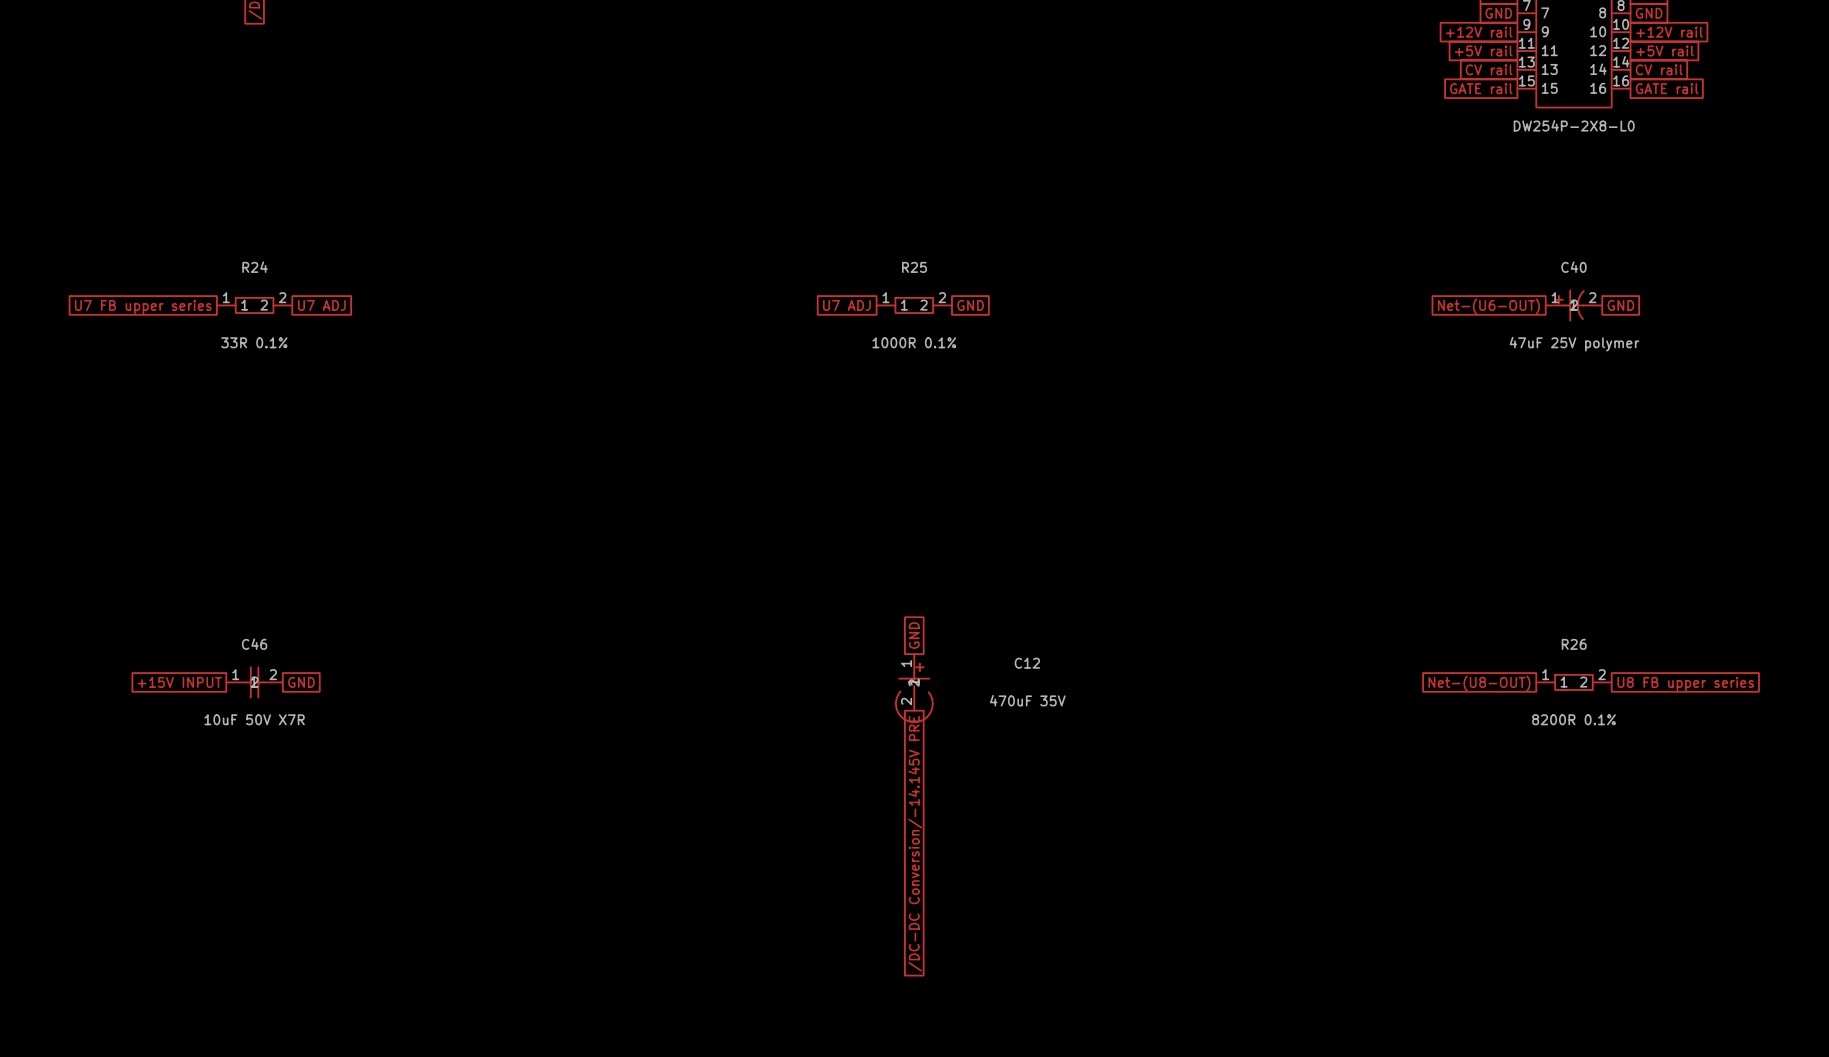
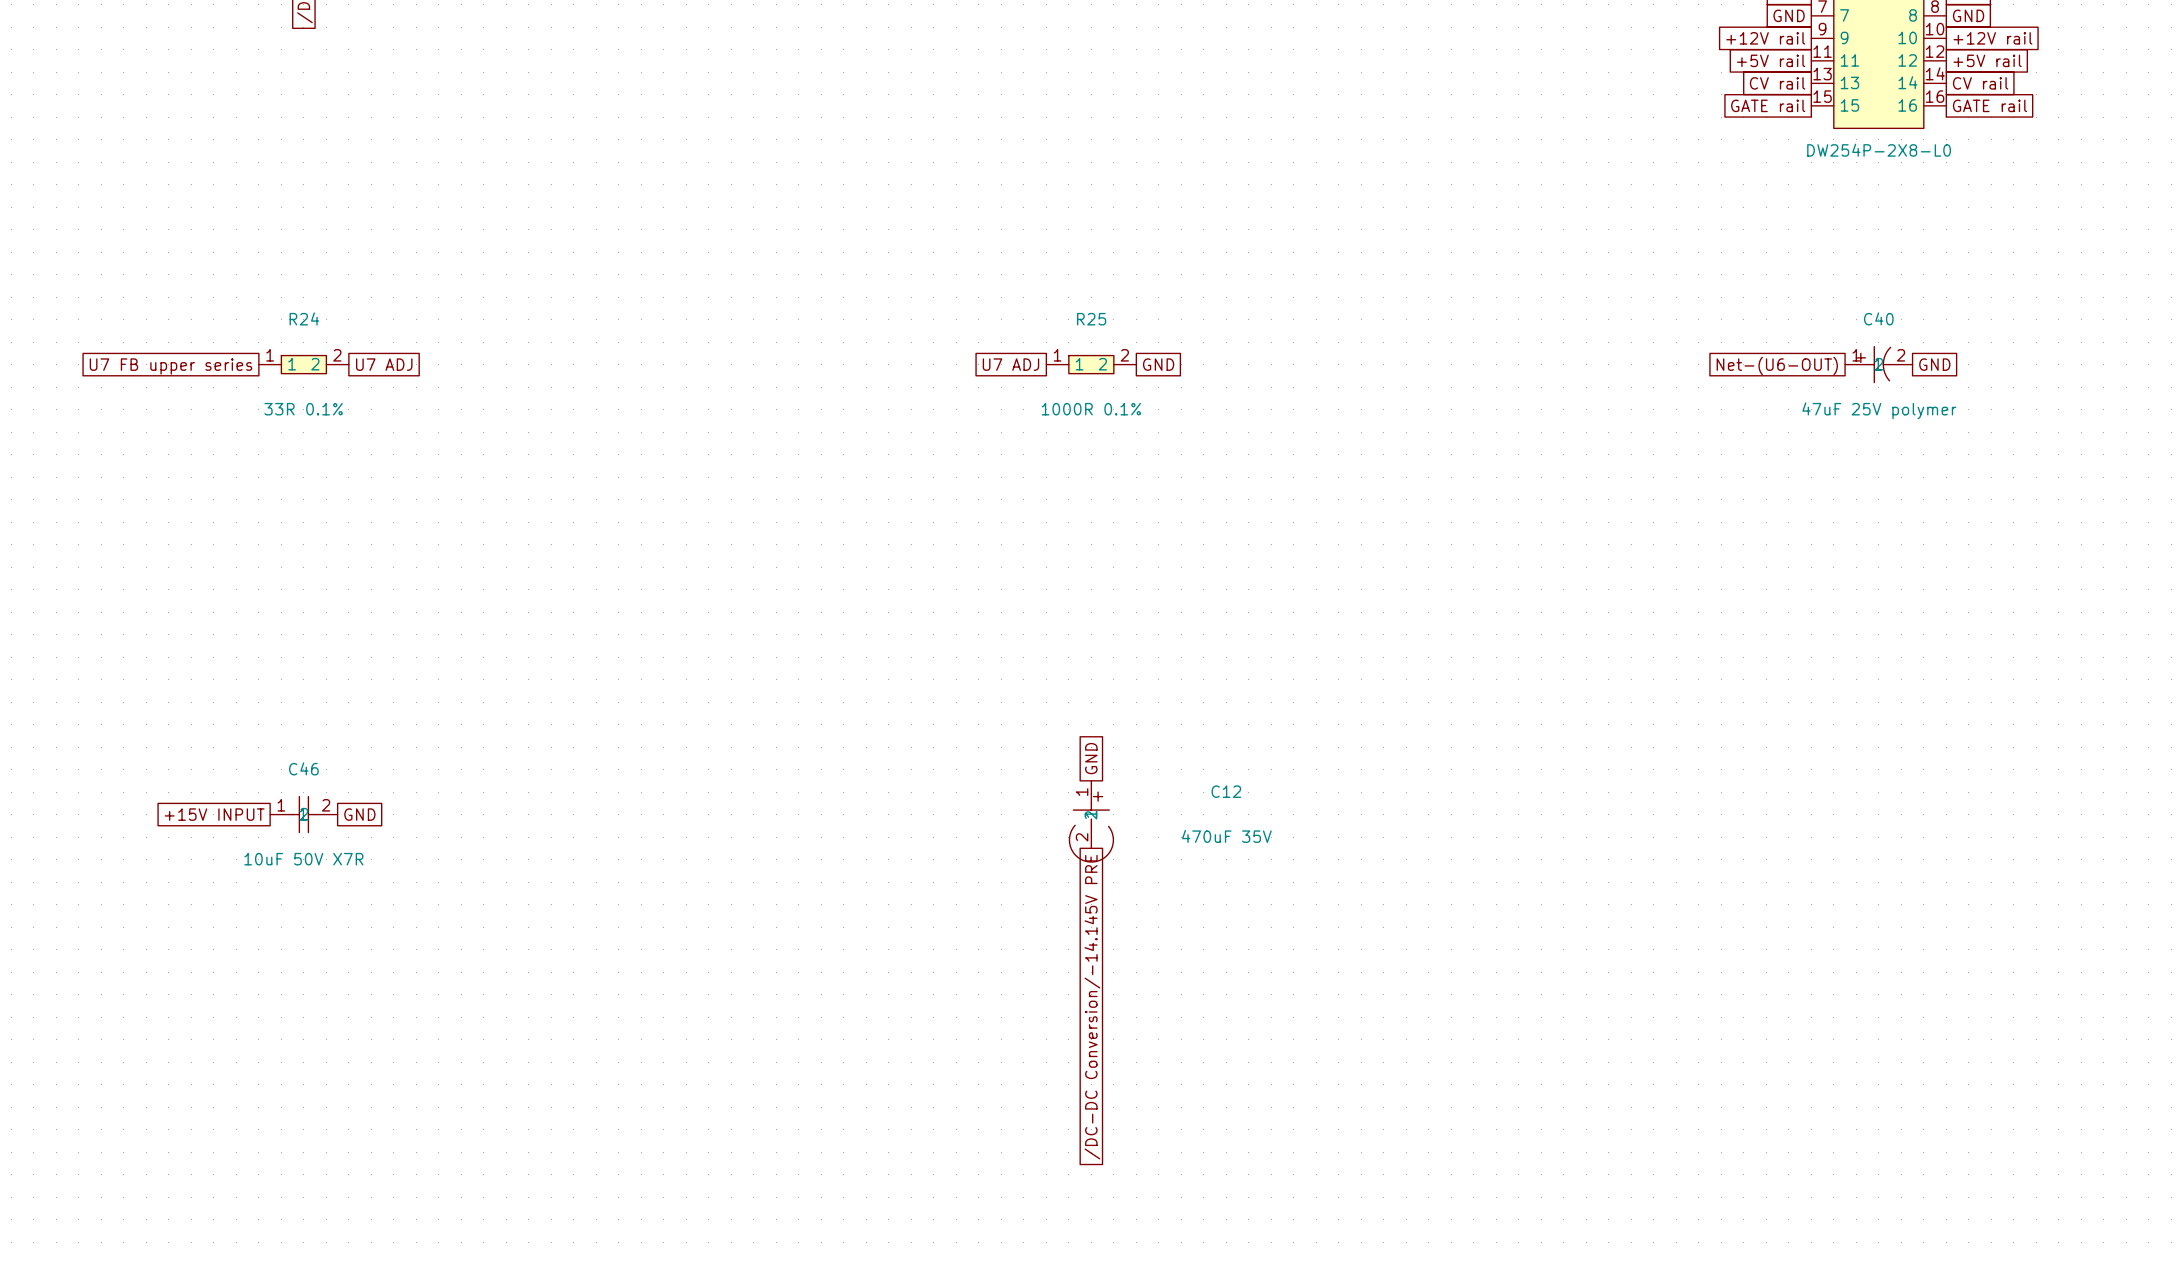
R26: 8200R 0.1% (1573, 682) -> none
global label: Net-(U8-OUT) (1479, 683) -> none
global label: U8 FB upper series (1685, 683) -> none

